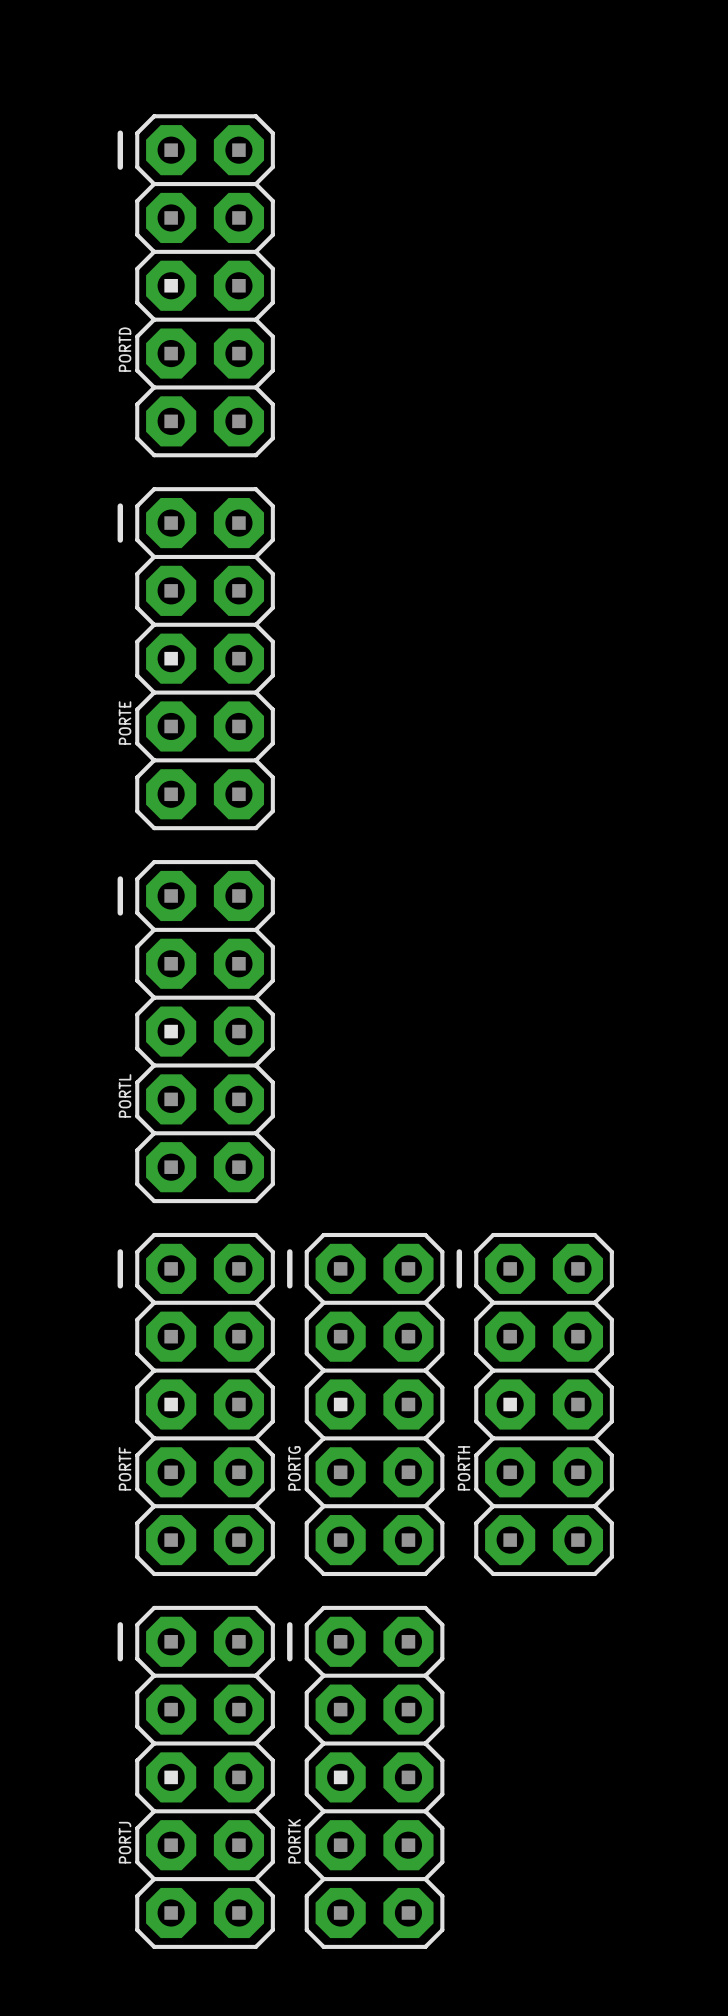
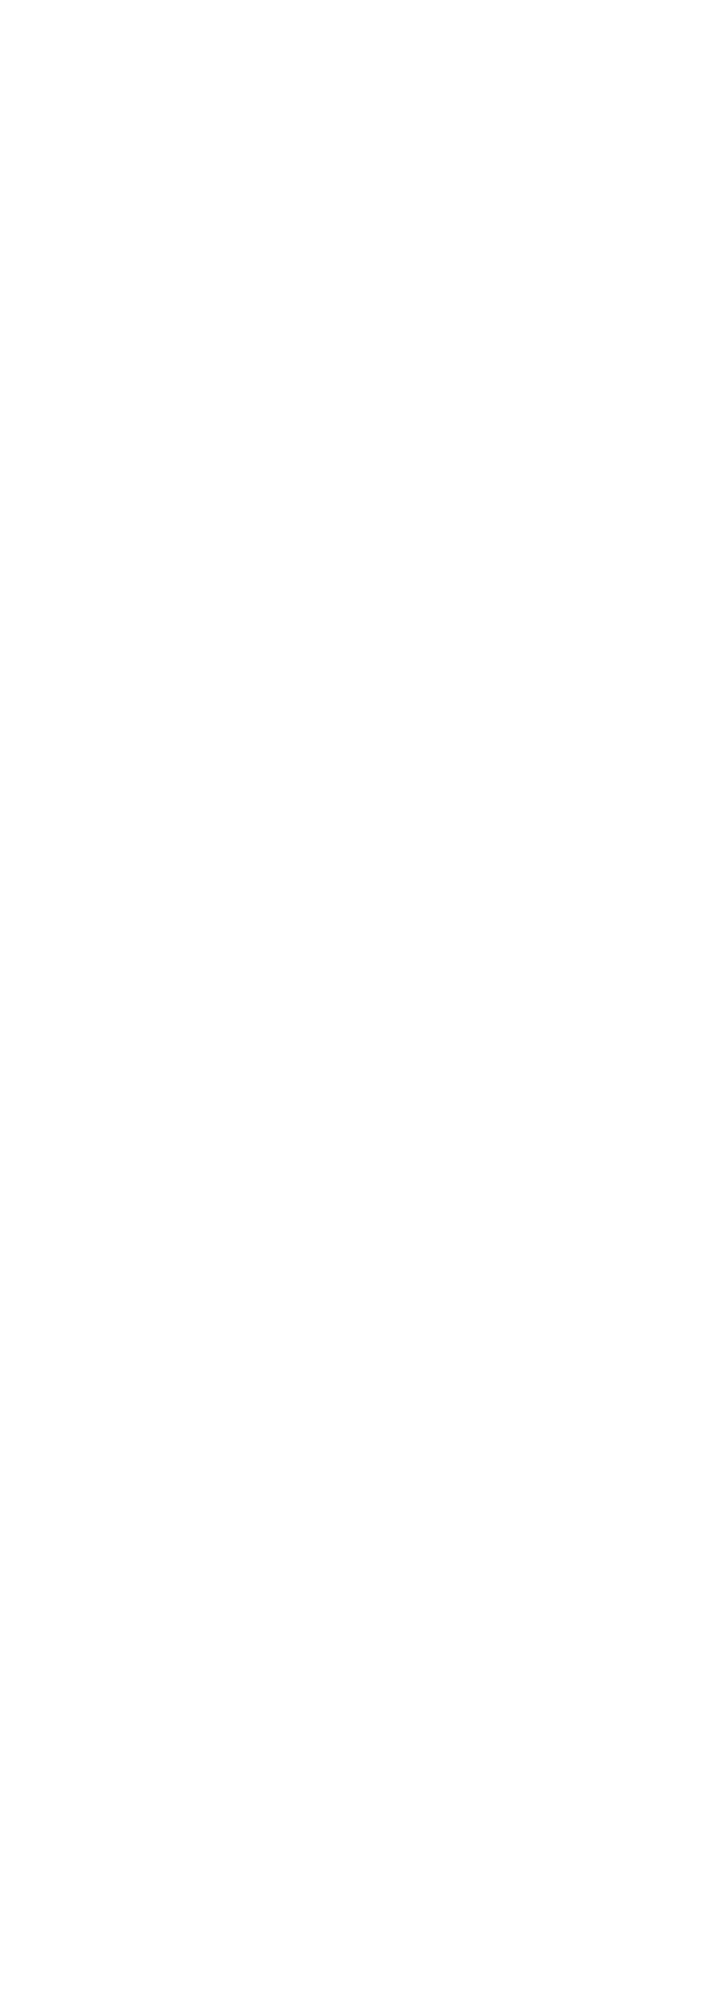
PORTD: (196, 285) -> none
PORTE: (196, 658) -> none
PORTL: (196, 1031) -> none
PORTF: (196, 1404) -> none
PORTG: (365, 1404) -> none
PORTH: (535, 1404) -> none
PORTJ: (196, 1777) -> none
PORTK: (365, 1777) -> none

